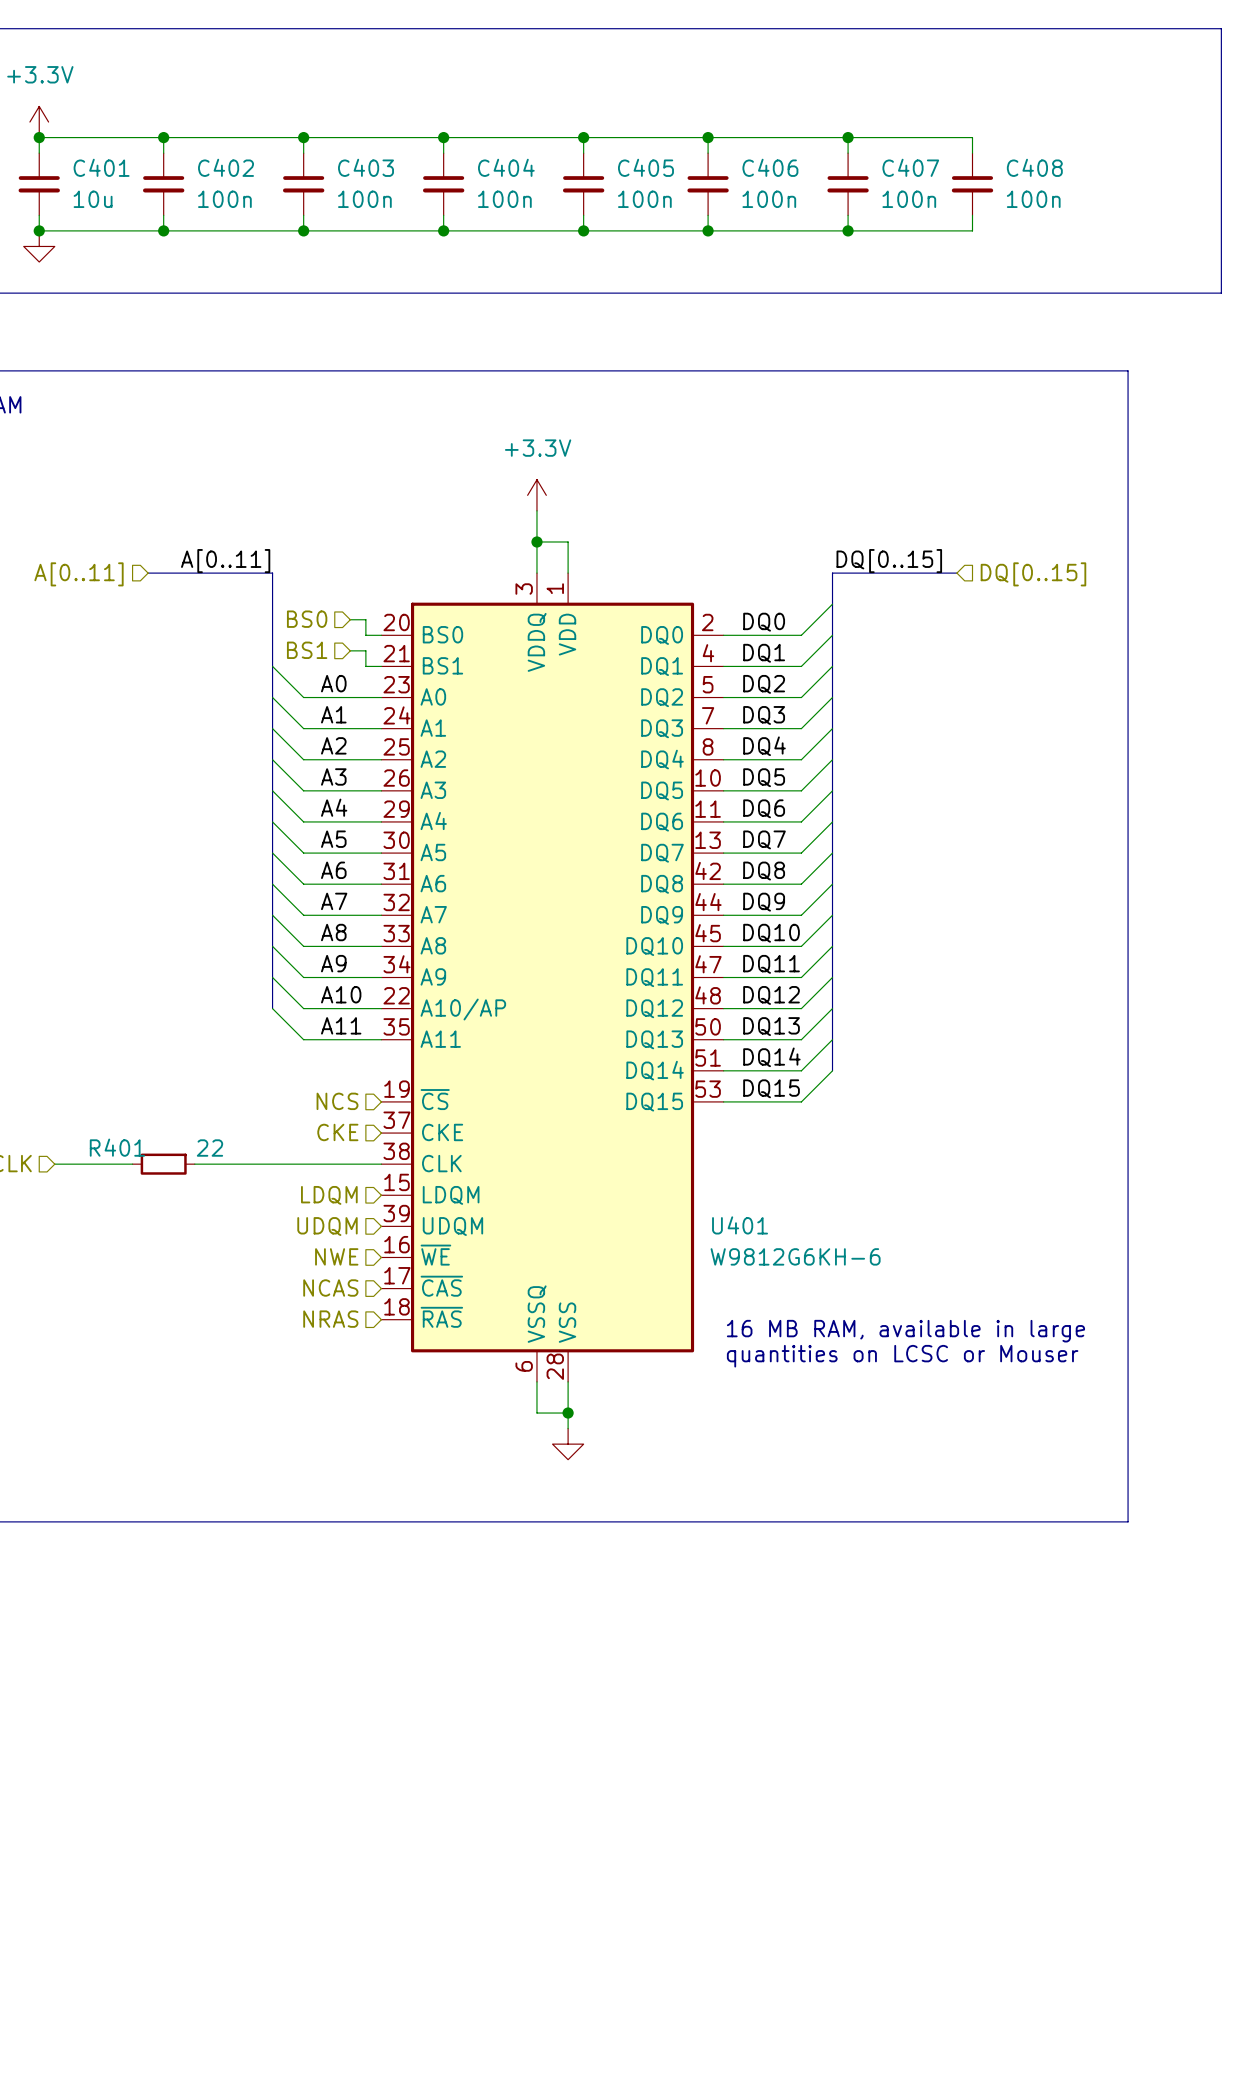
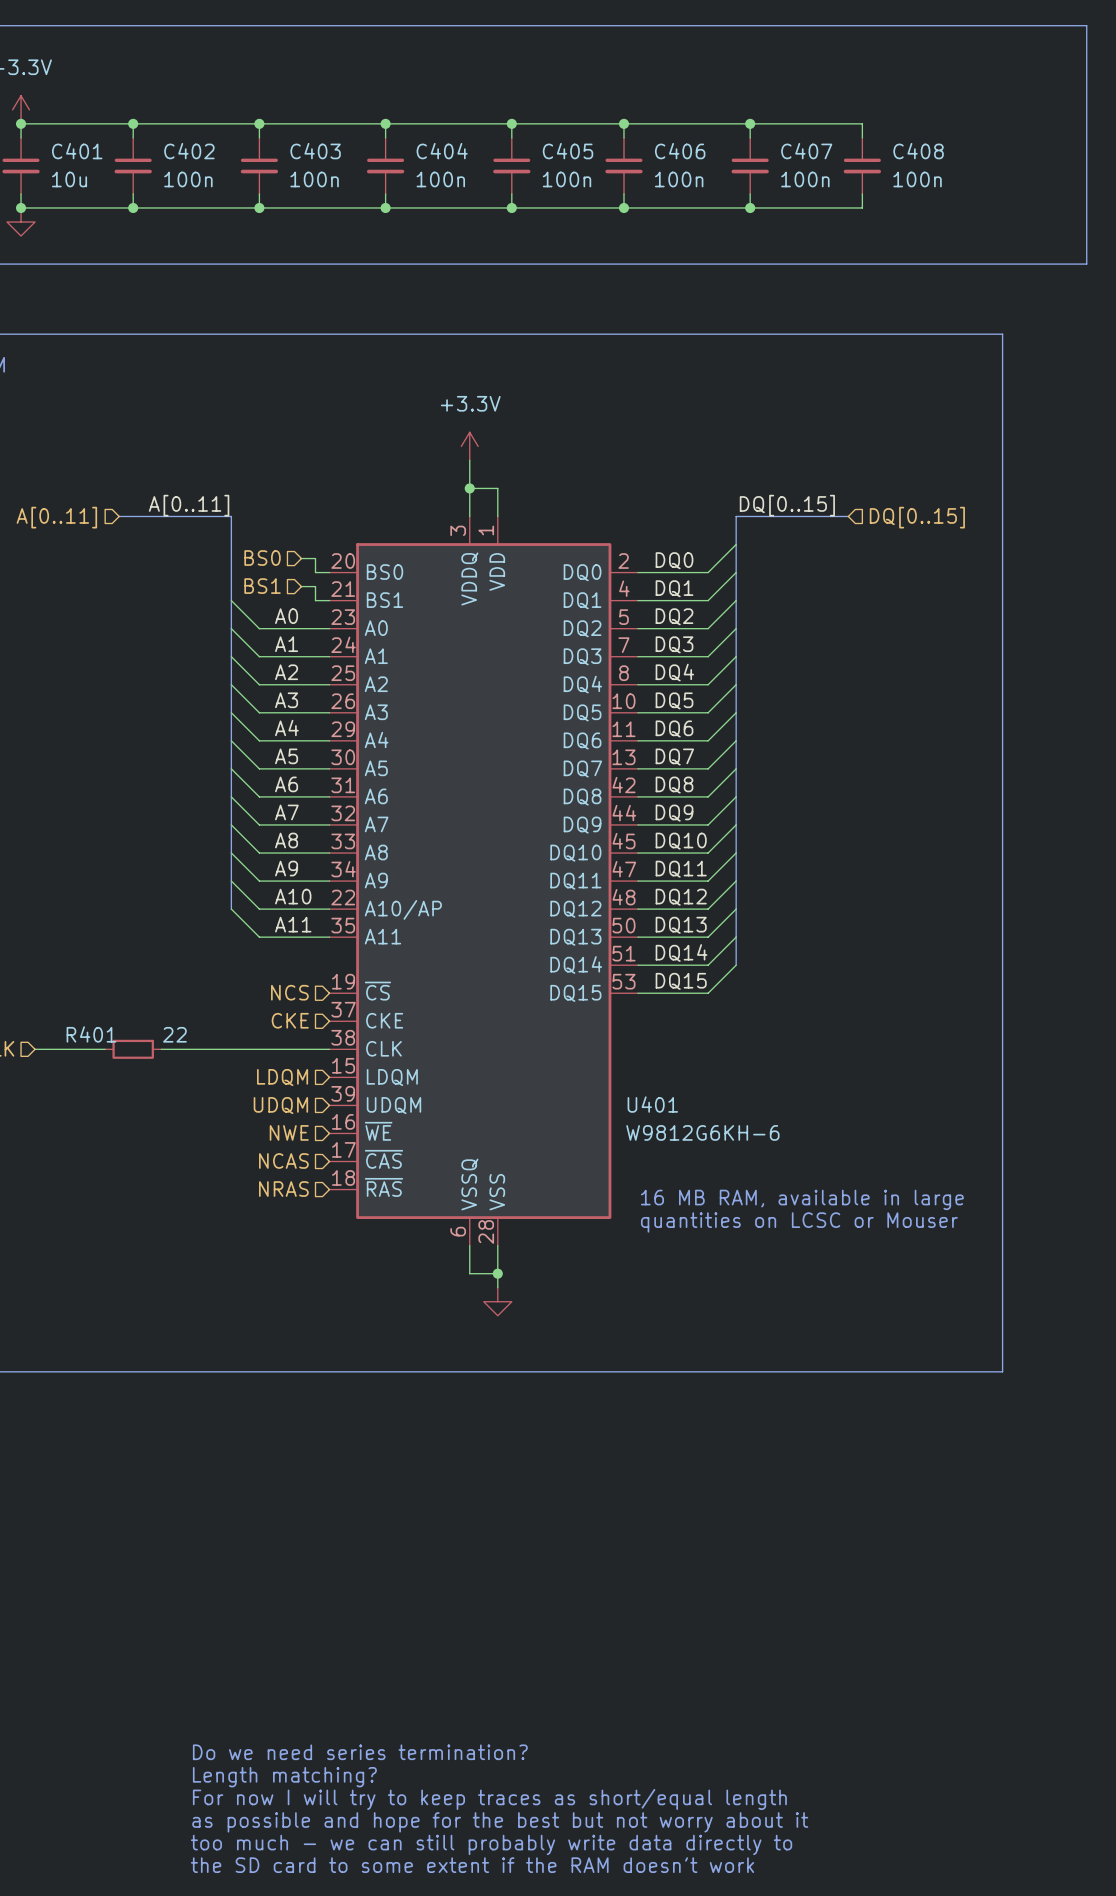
text: none -> Do we need series termination? (360, 1752)
text: none -> Length matching? (284, 1777)
text: none -> For now I will try to keep traces as short/equal length (489, 1799)
text: none -> as possible and hope for the best but not worry about it (500, 1822)
text: none -> too much - we can still probably write data directly to (491, 1844)
text: none -> the SD card to some extent if the RAM doesn't work (472, 1865)

